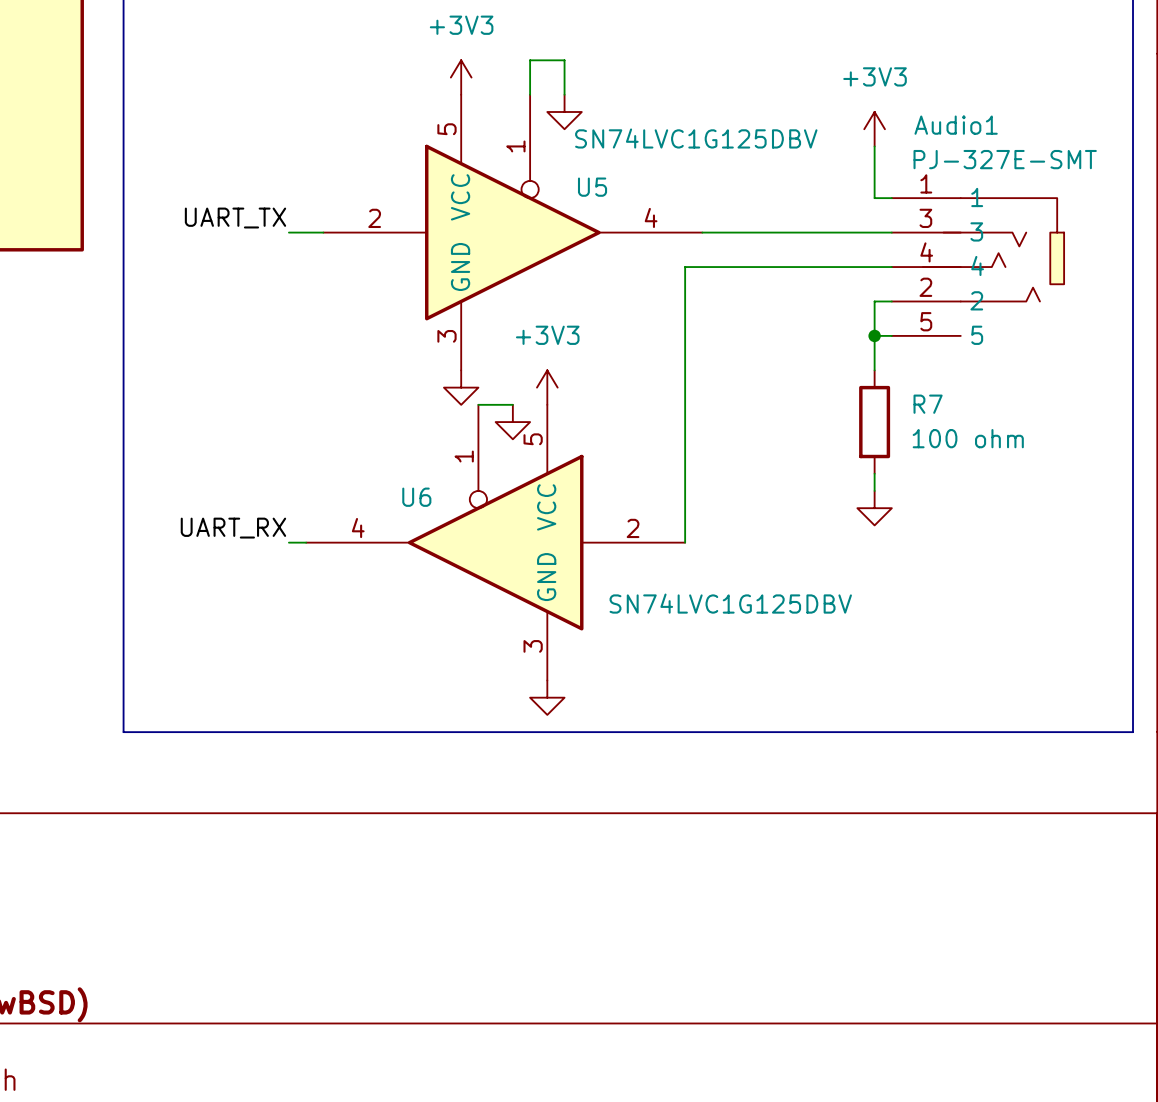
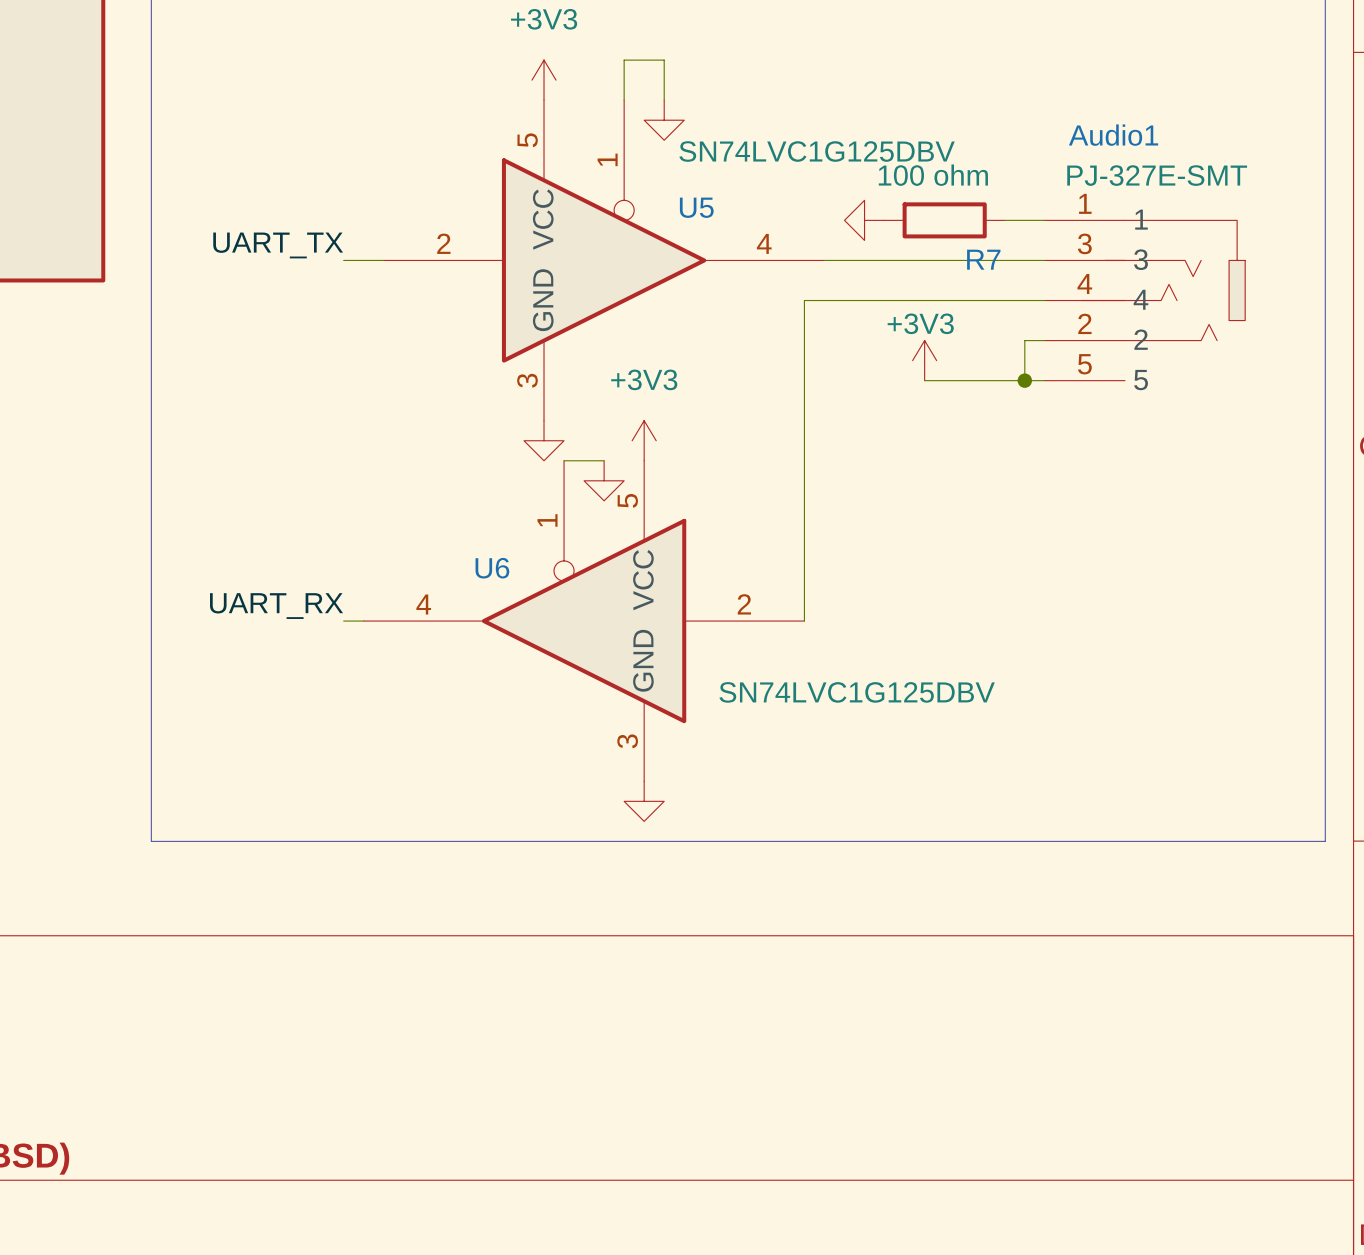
power symbol text position: +3V3 (875, 76) -> +3V3 (920, 323)
power symbol position: +3V3 (874, 129) -> +3V3 (924, 360)
wire: (874, 146) (874, 198) -> (1004, 220) (1024, 220)
power symbol: none -> (864, 220)
wire: (874, 335) (874, 370) -> (1024, 380) (924, 380)
R7 name position: R7 (928, 404) -> R7 (983, 259)
R7 rotation: 0° (874, 422) -> 90° clockwise (944, 220)
R7 position: (874, 422) -> (944, 220)
R7 value position: 100 ohm (968, 438) -> 100 ohm (933, 175)
wire: (874, 473) (874, 490) -> none
power symbol: (874, 508) -> none

